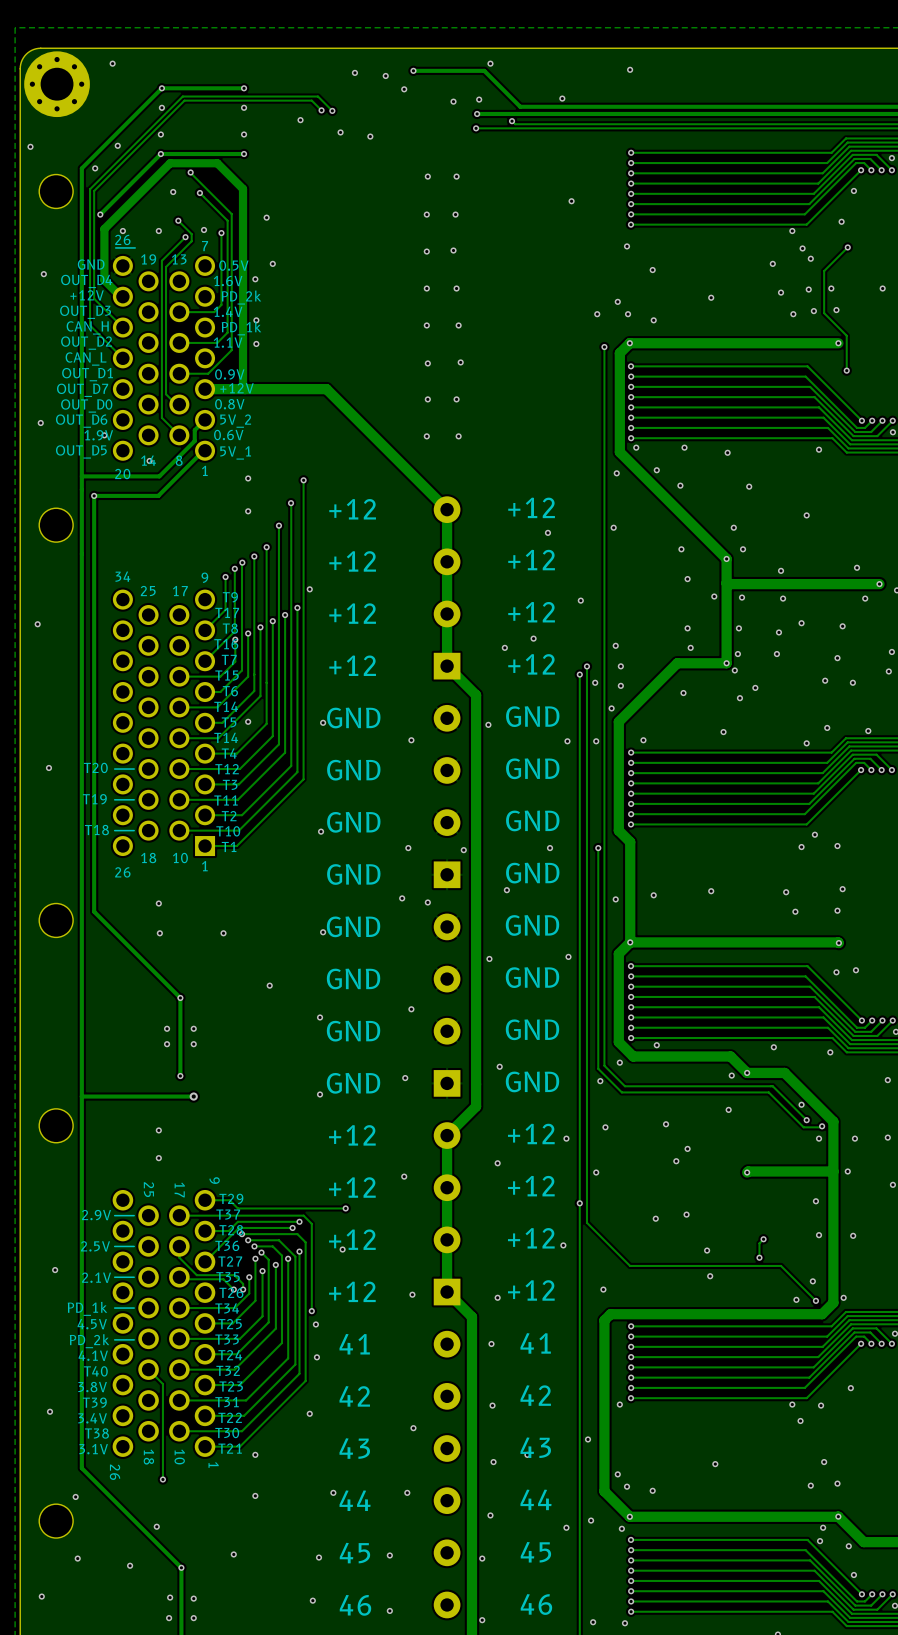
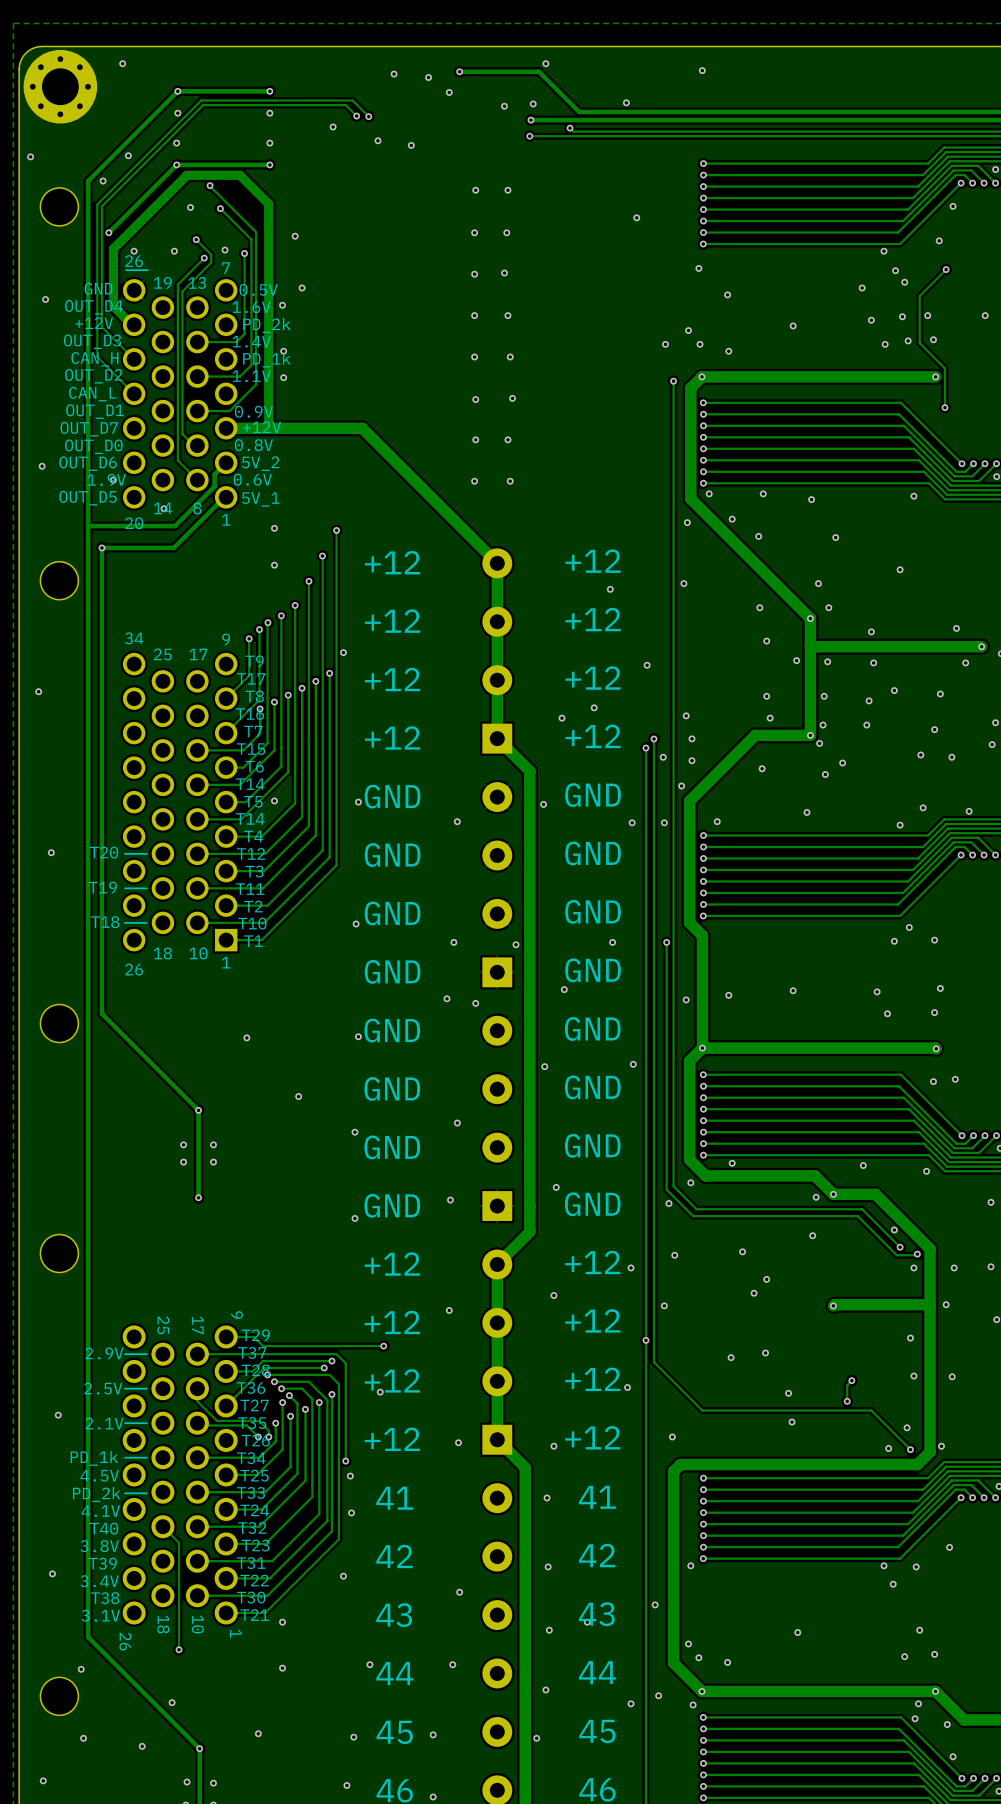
via: (158, 903) -> none
via: (159, 933) -> none
track: (193, 1096) (81, 1096) -> none
via: (193, 1096) -> none
via: (158, 1130) -> none
via: (158, 1158) -> none

